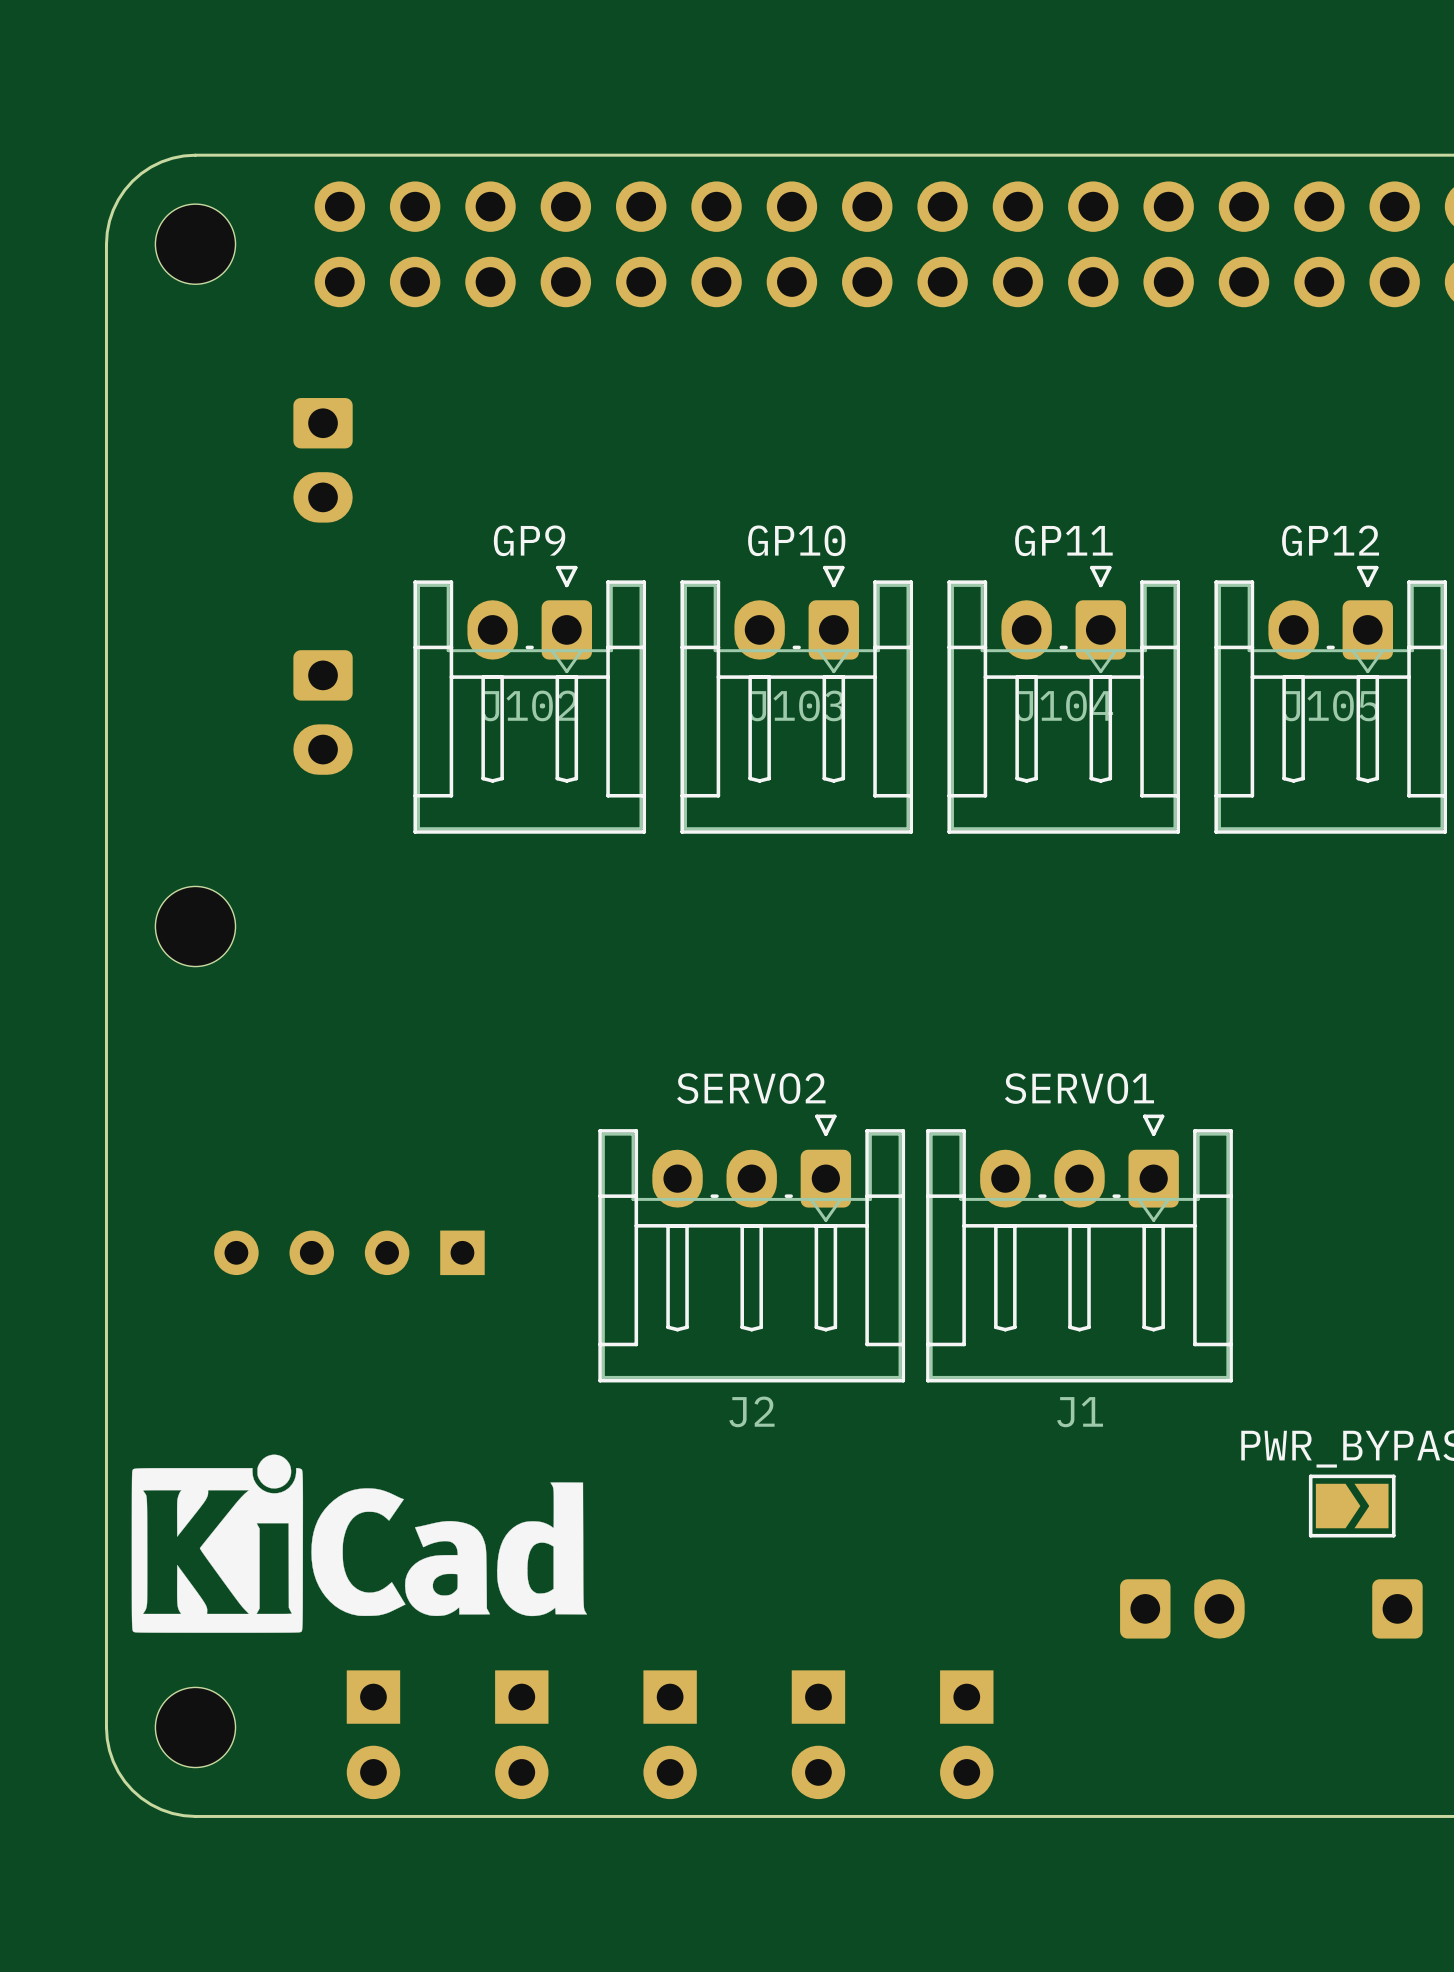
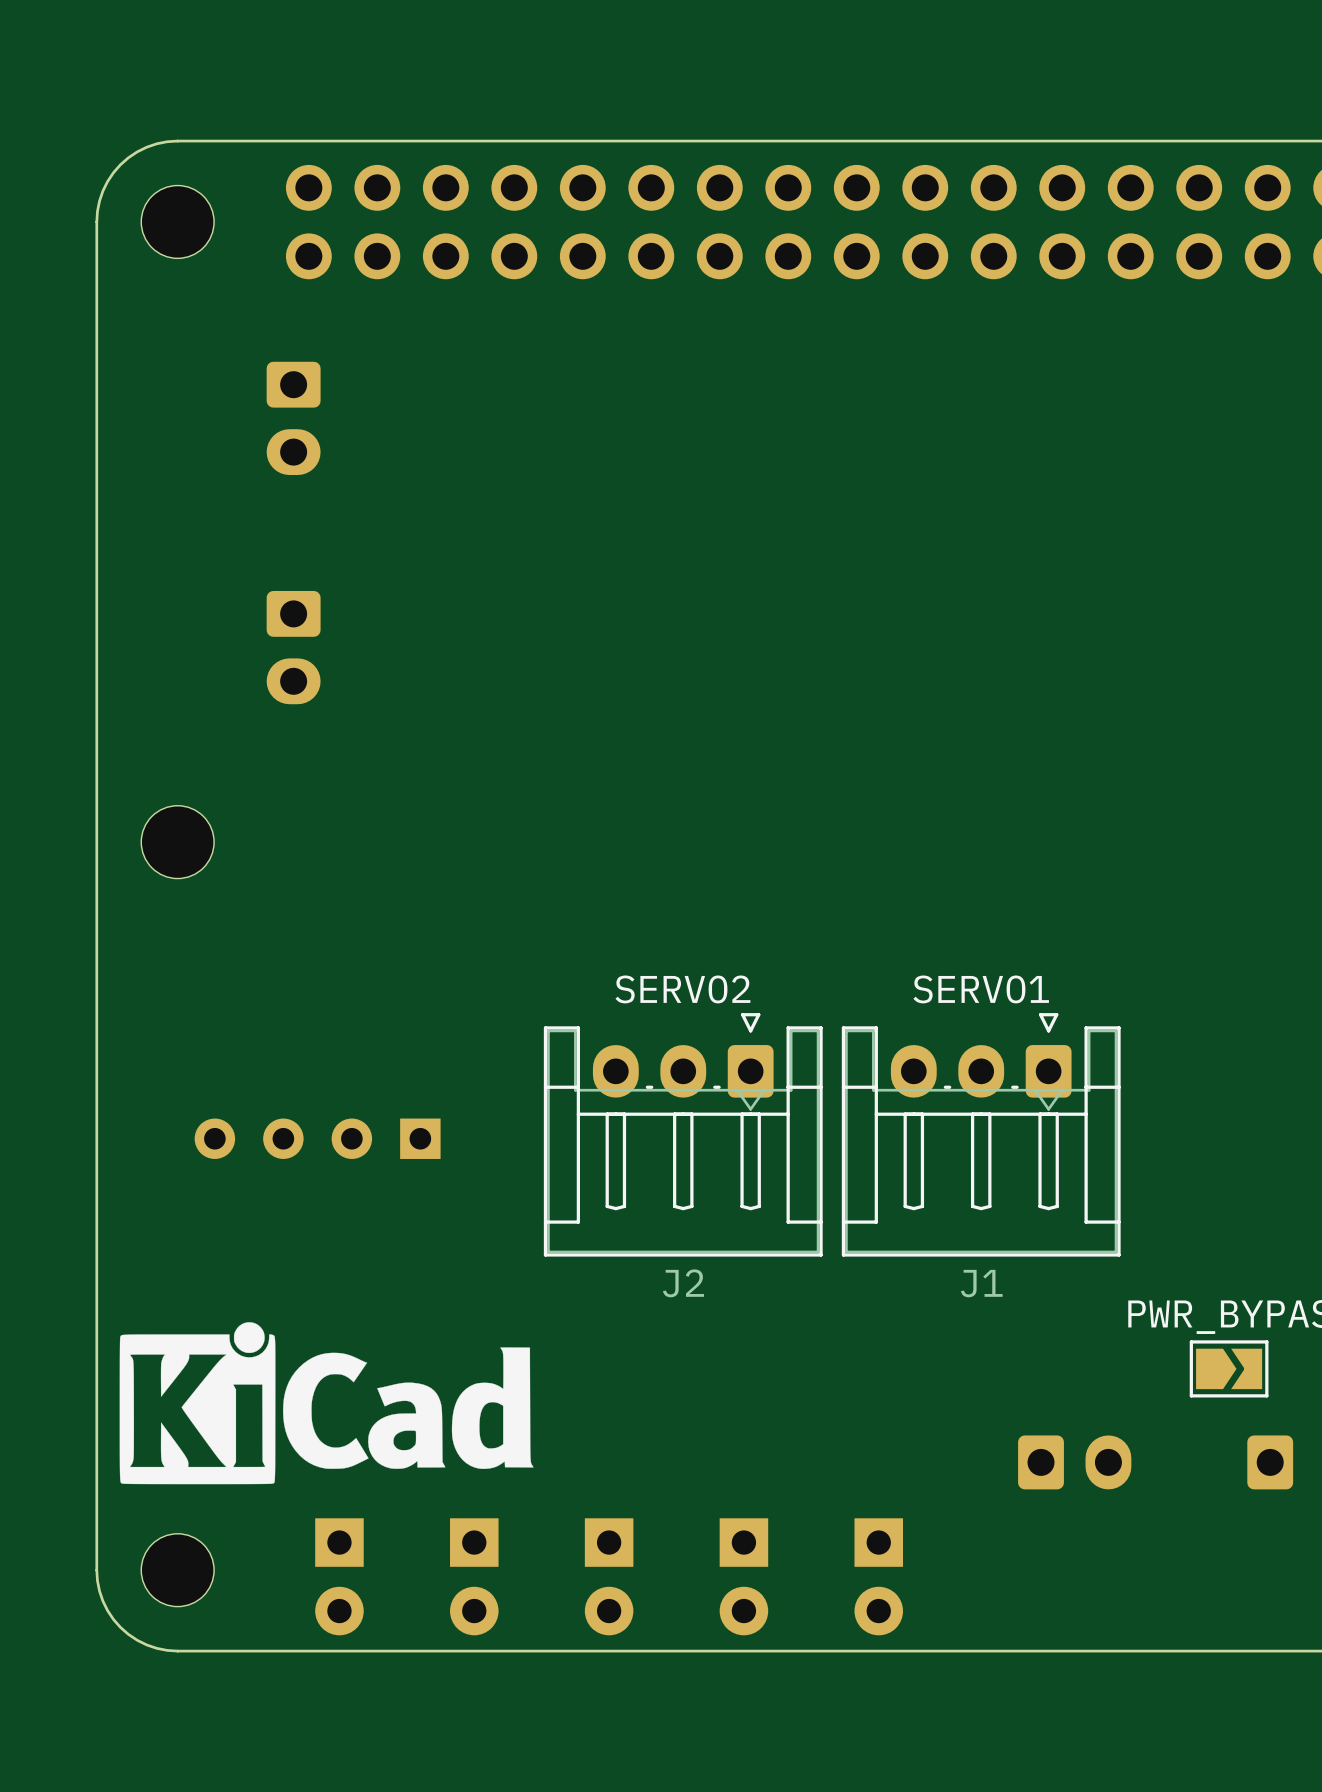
J102: GP9 (529, 699) -> none
J103: GP10 (796, 699) -> none
J104: GP11 (1063, 699) -> none
J105: GP12 (1330, 699) -> none

